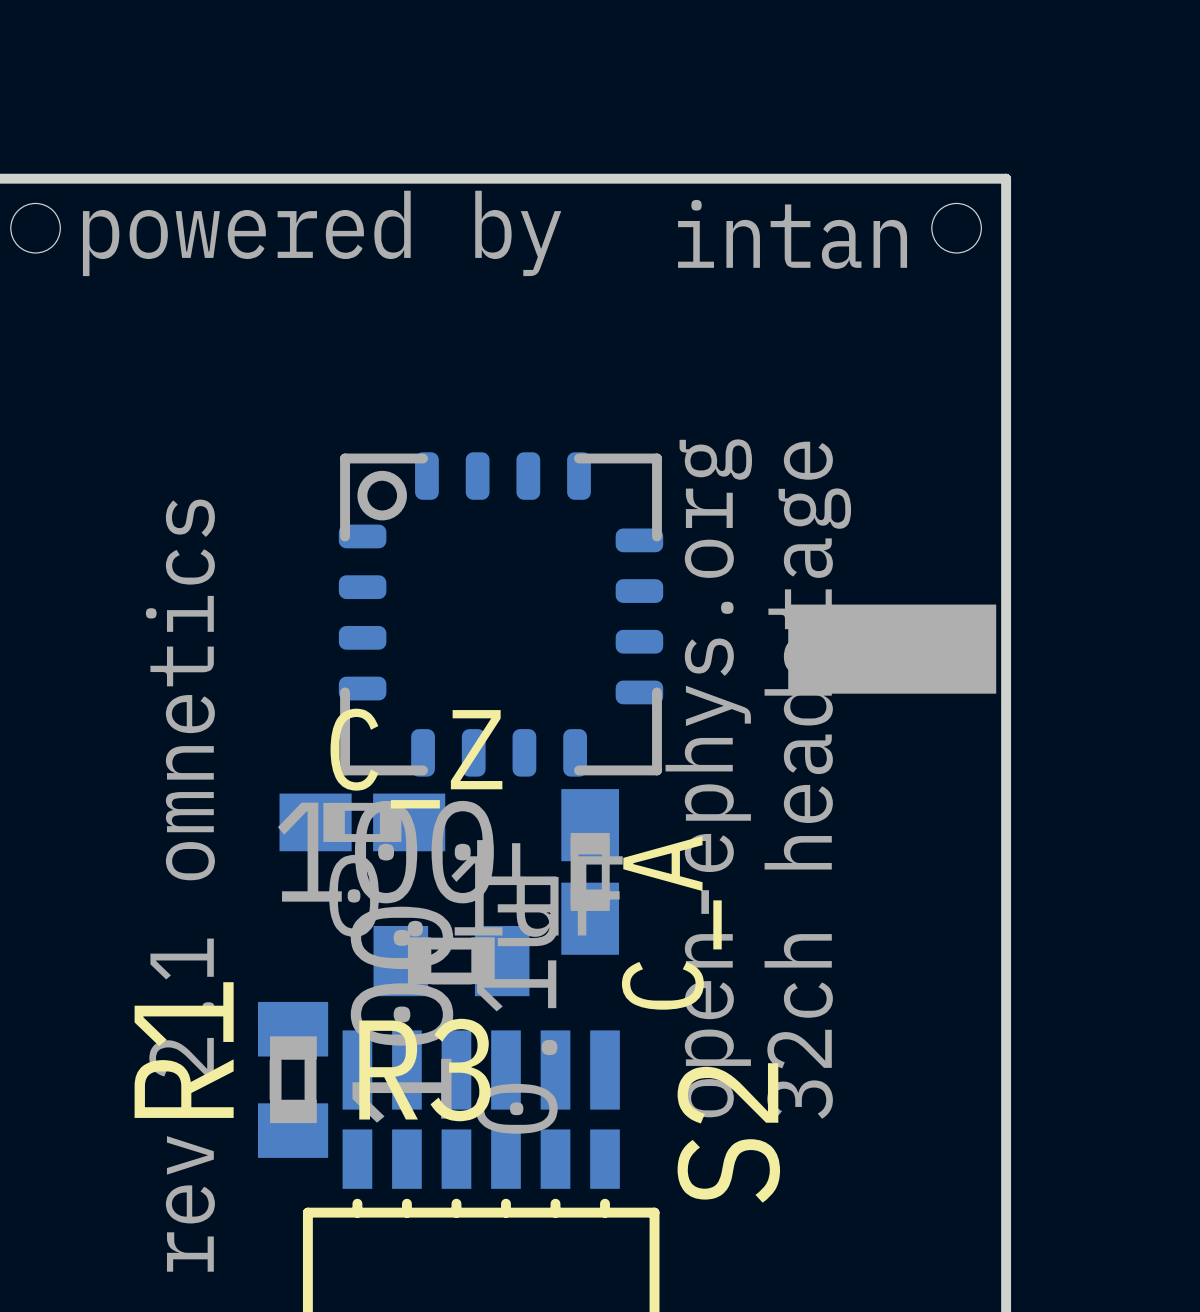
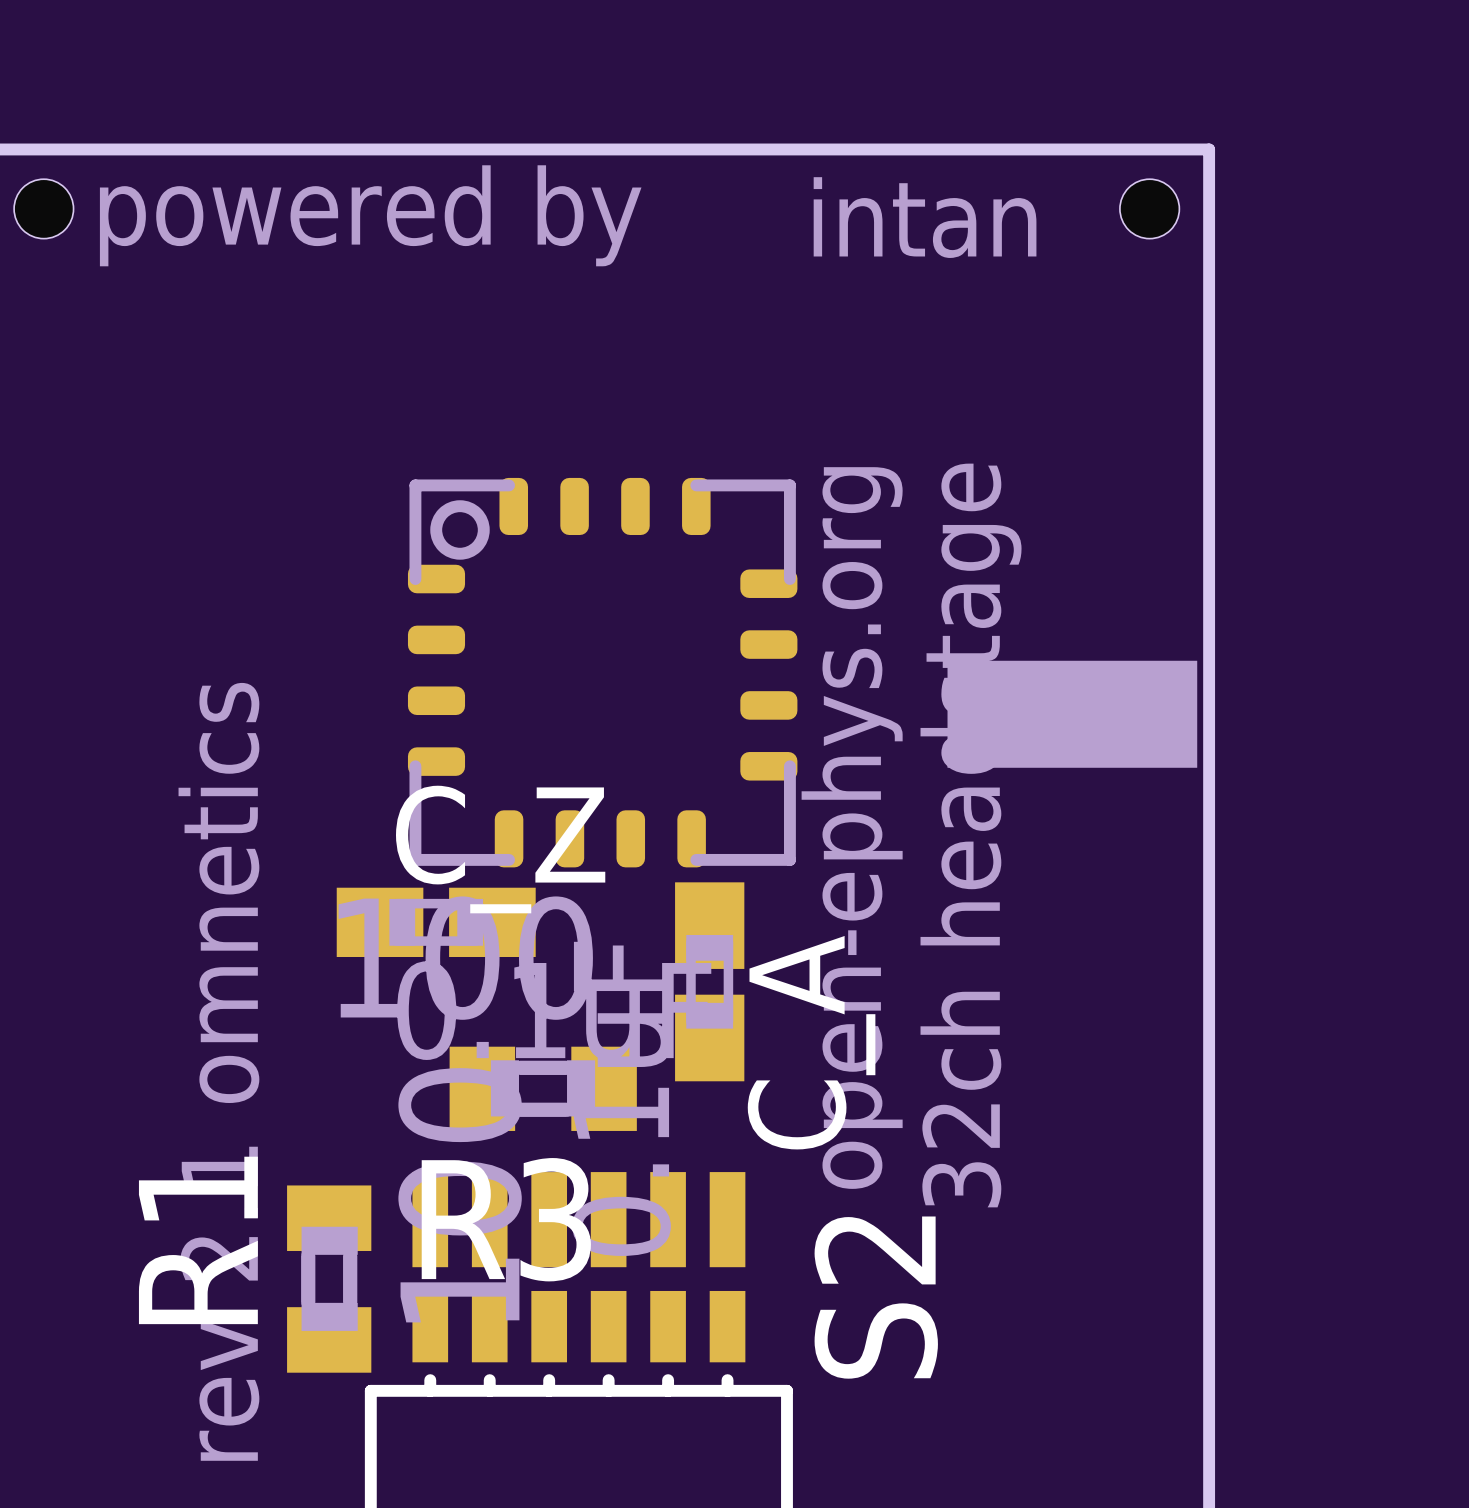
R1 position: (293, 1079) -> (329, 1279)

